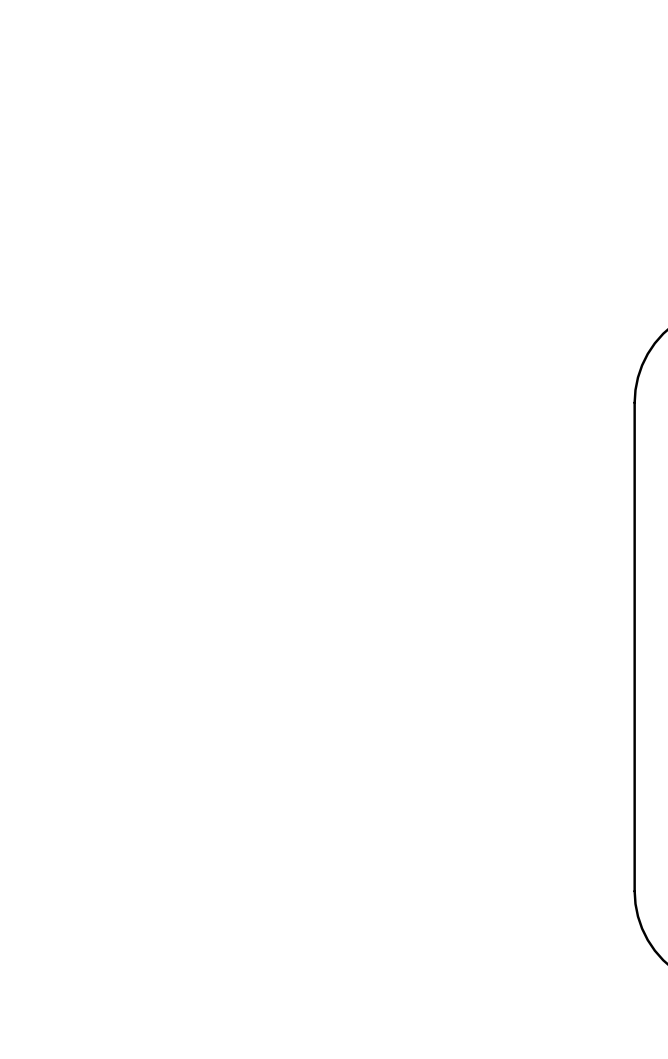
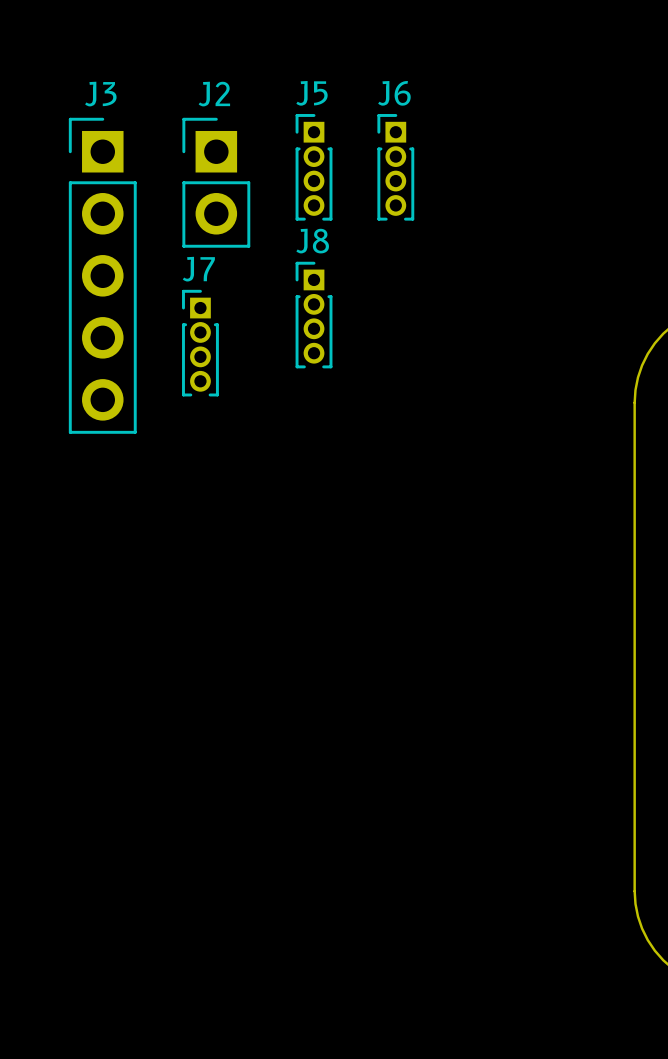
J5: none -> (314, 167)
J6: none -> (395, 167)
J2: none -> (216, 182)
J3: none -> (102, 275)
J8: none -> (314, 315)
J7: none -> (200, 343)

